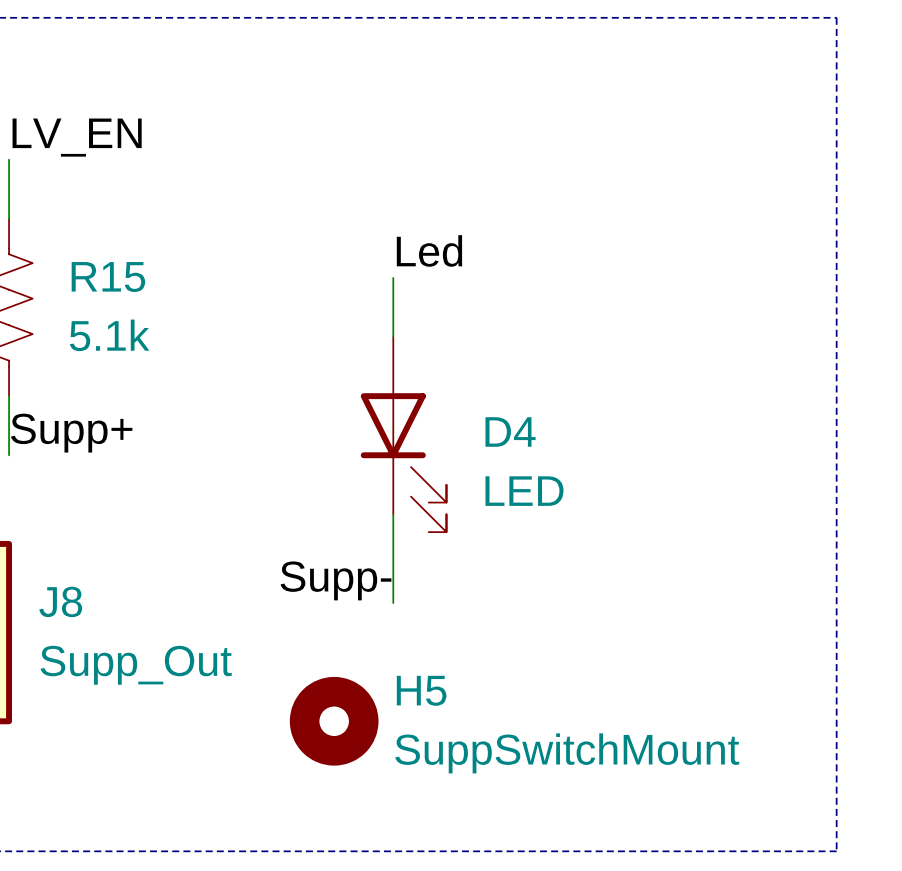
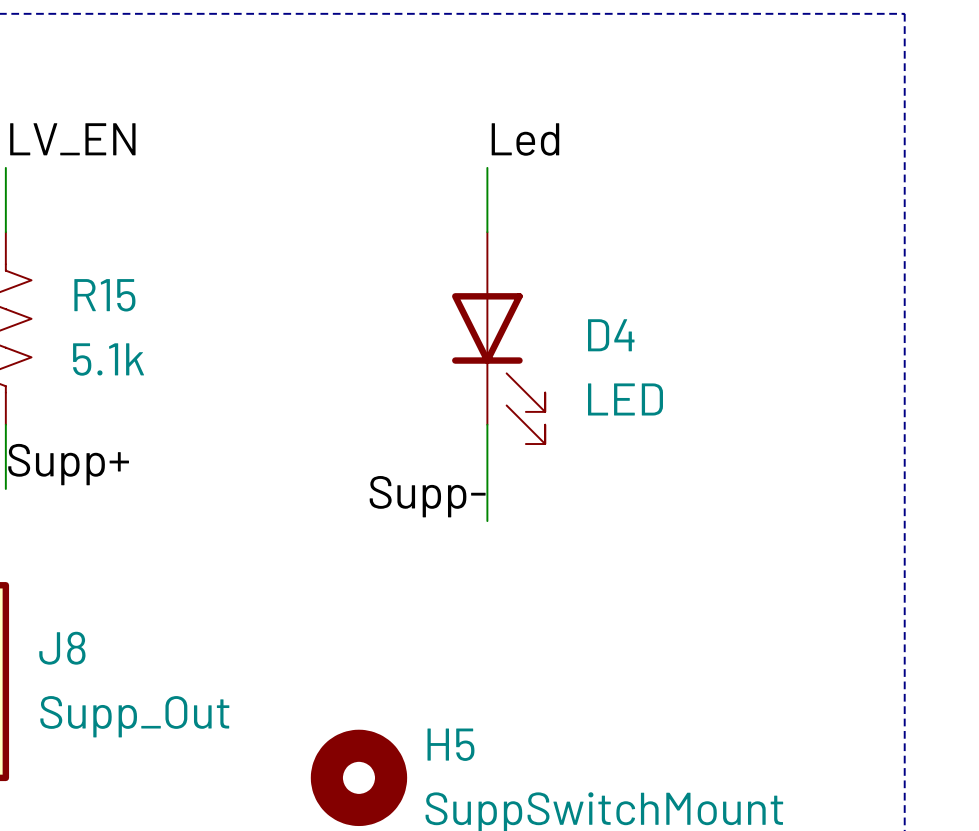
label position: Led (429, 250) -> Led (525, 139)
wire: (393, 277) (393, 337) -> (487, 167) (487, 232)
D4 position: (403, 434) -> (498, 338)
wire: (393, 514) (393, 603) -> (487, 424) (487, 521)
label position: Supp- (335, 580) -> Supp- (427, 496)

